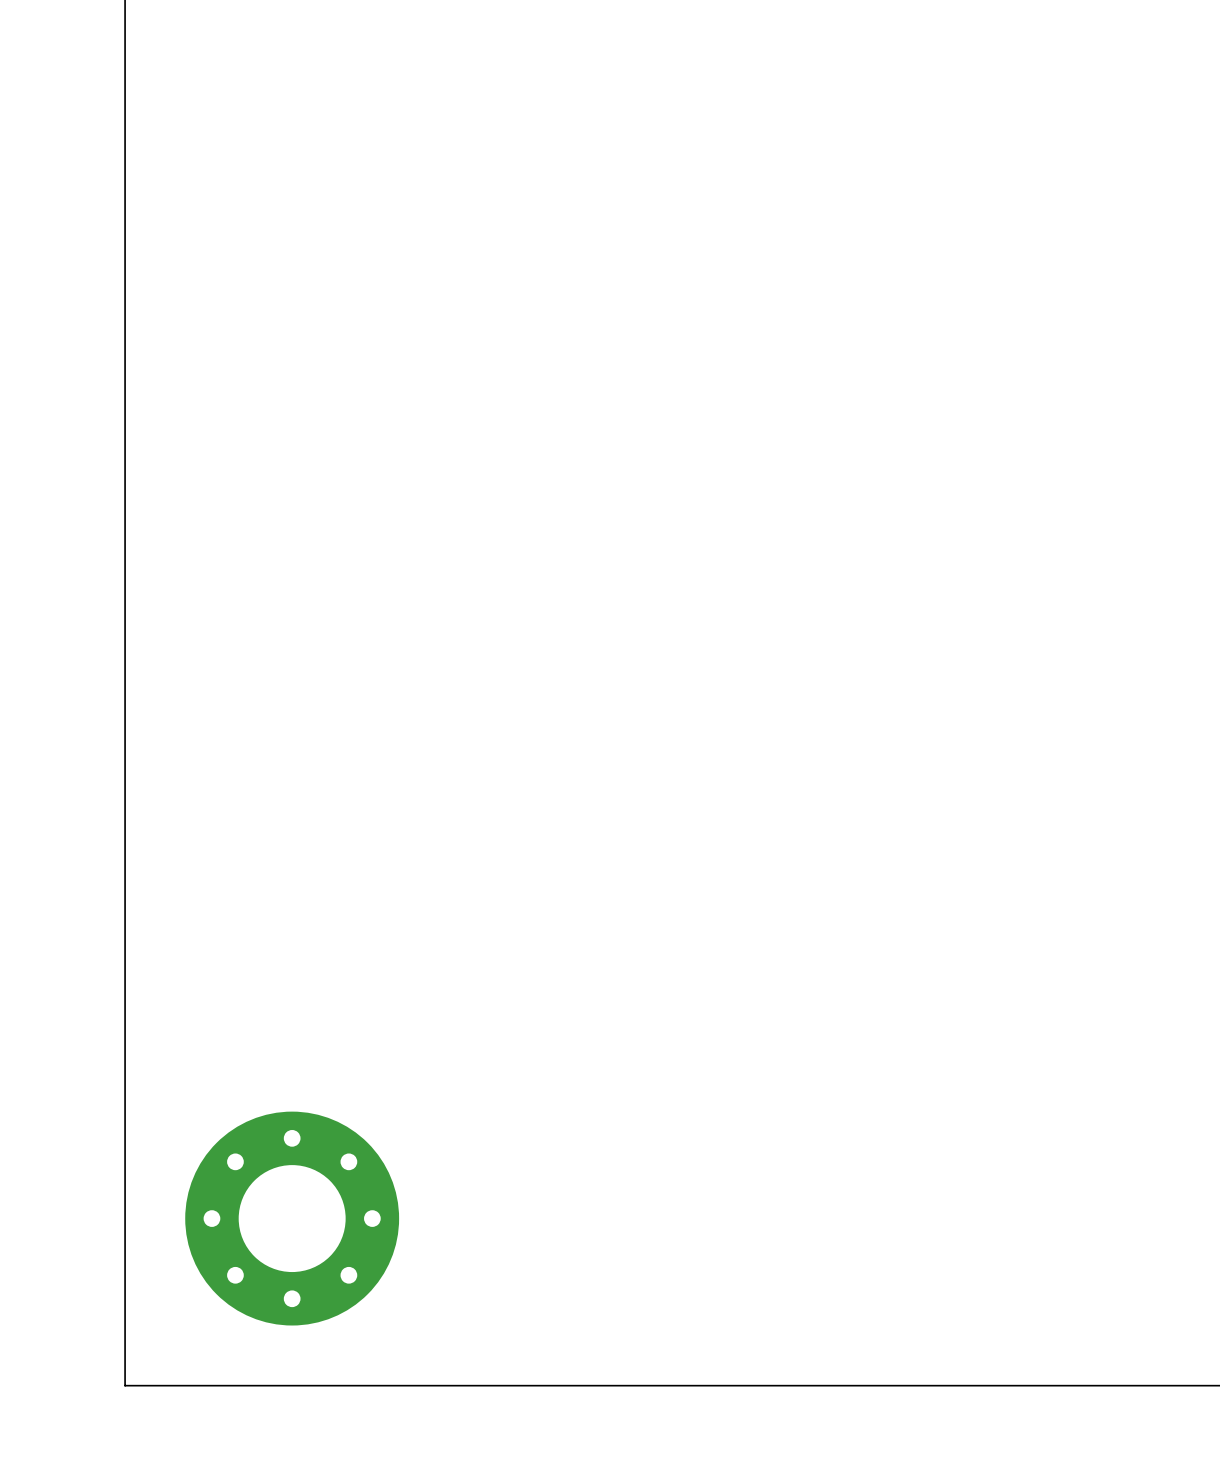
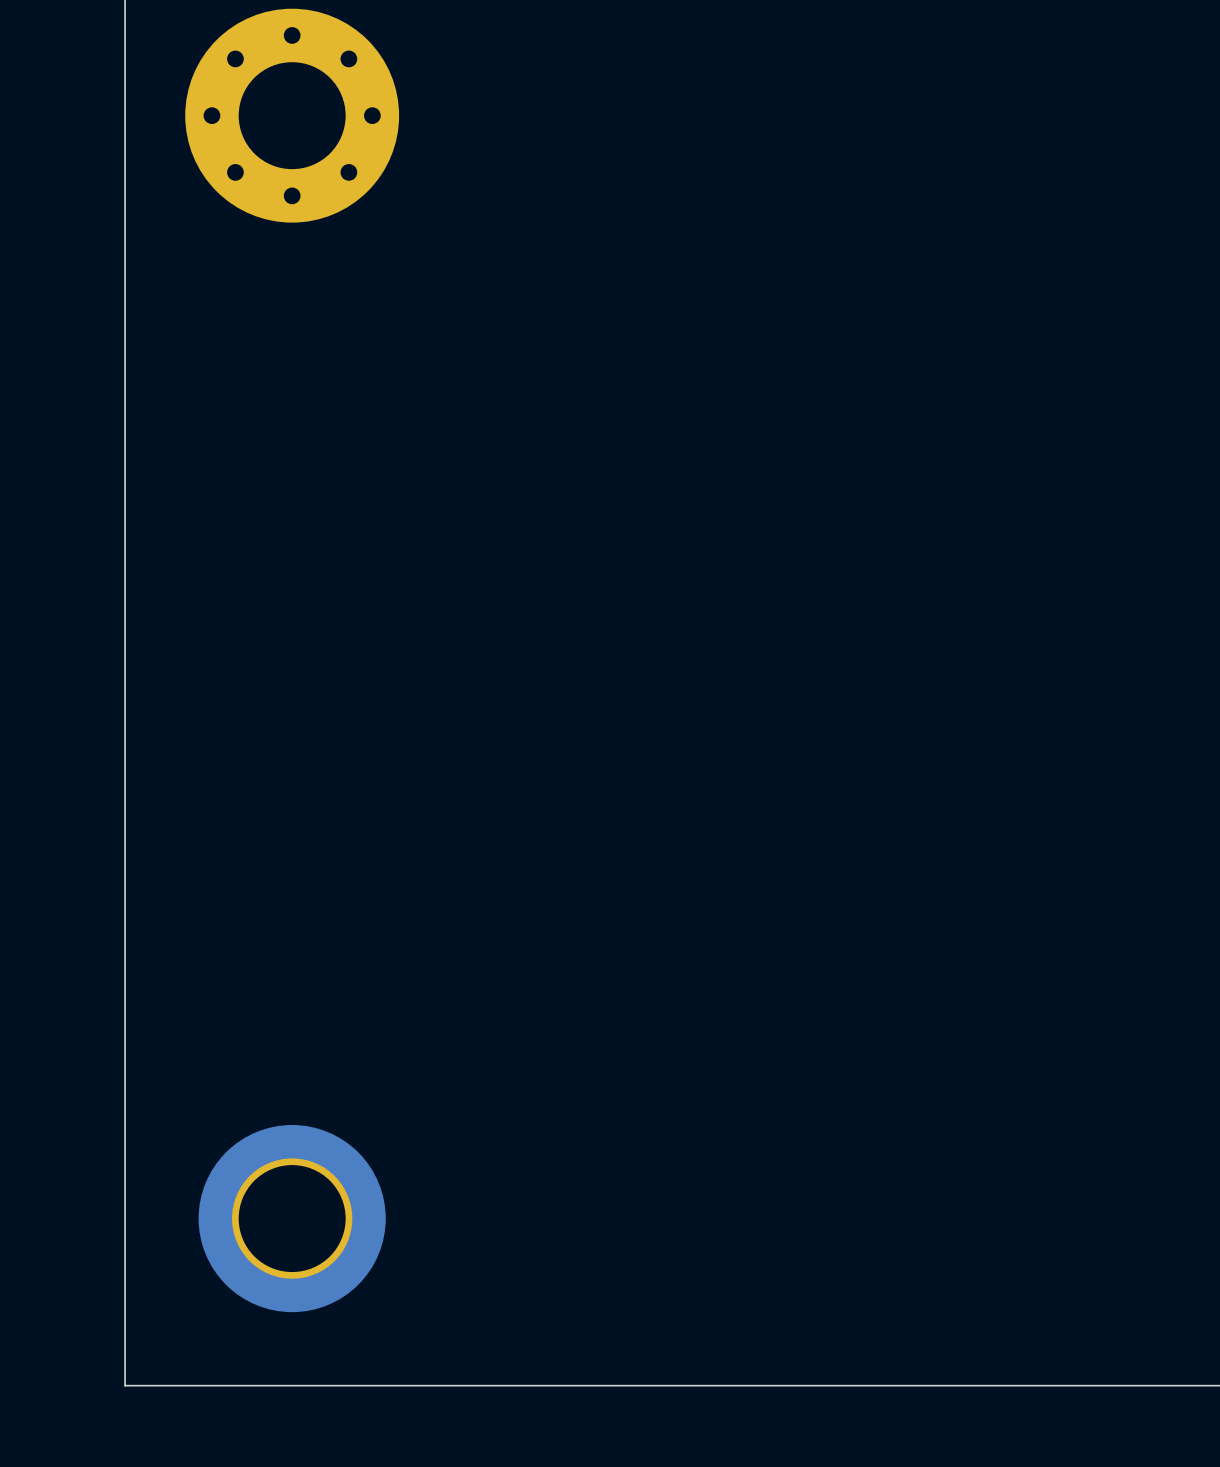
part: none -> (292, 115)
part footprint: [185, 1111, 400, 1326] -> [198, 1124, 386, 1313]

